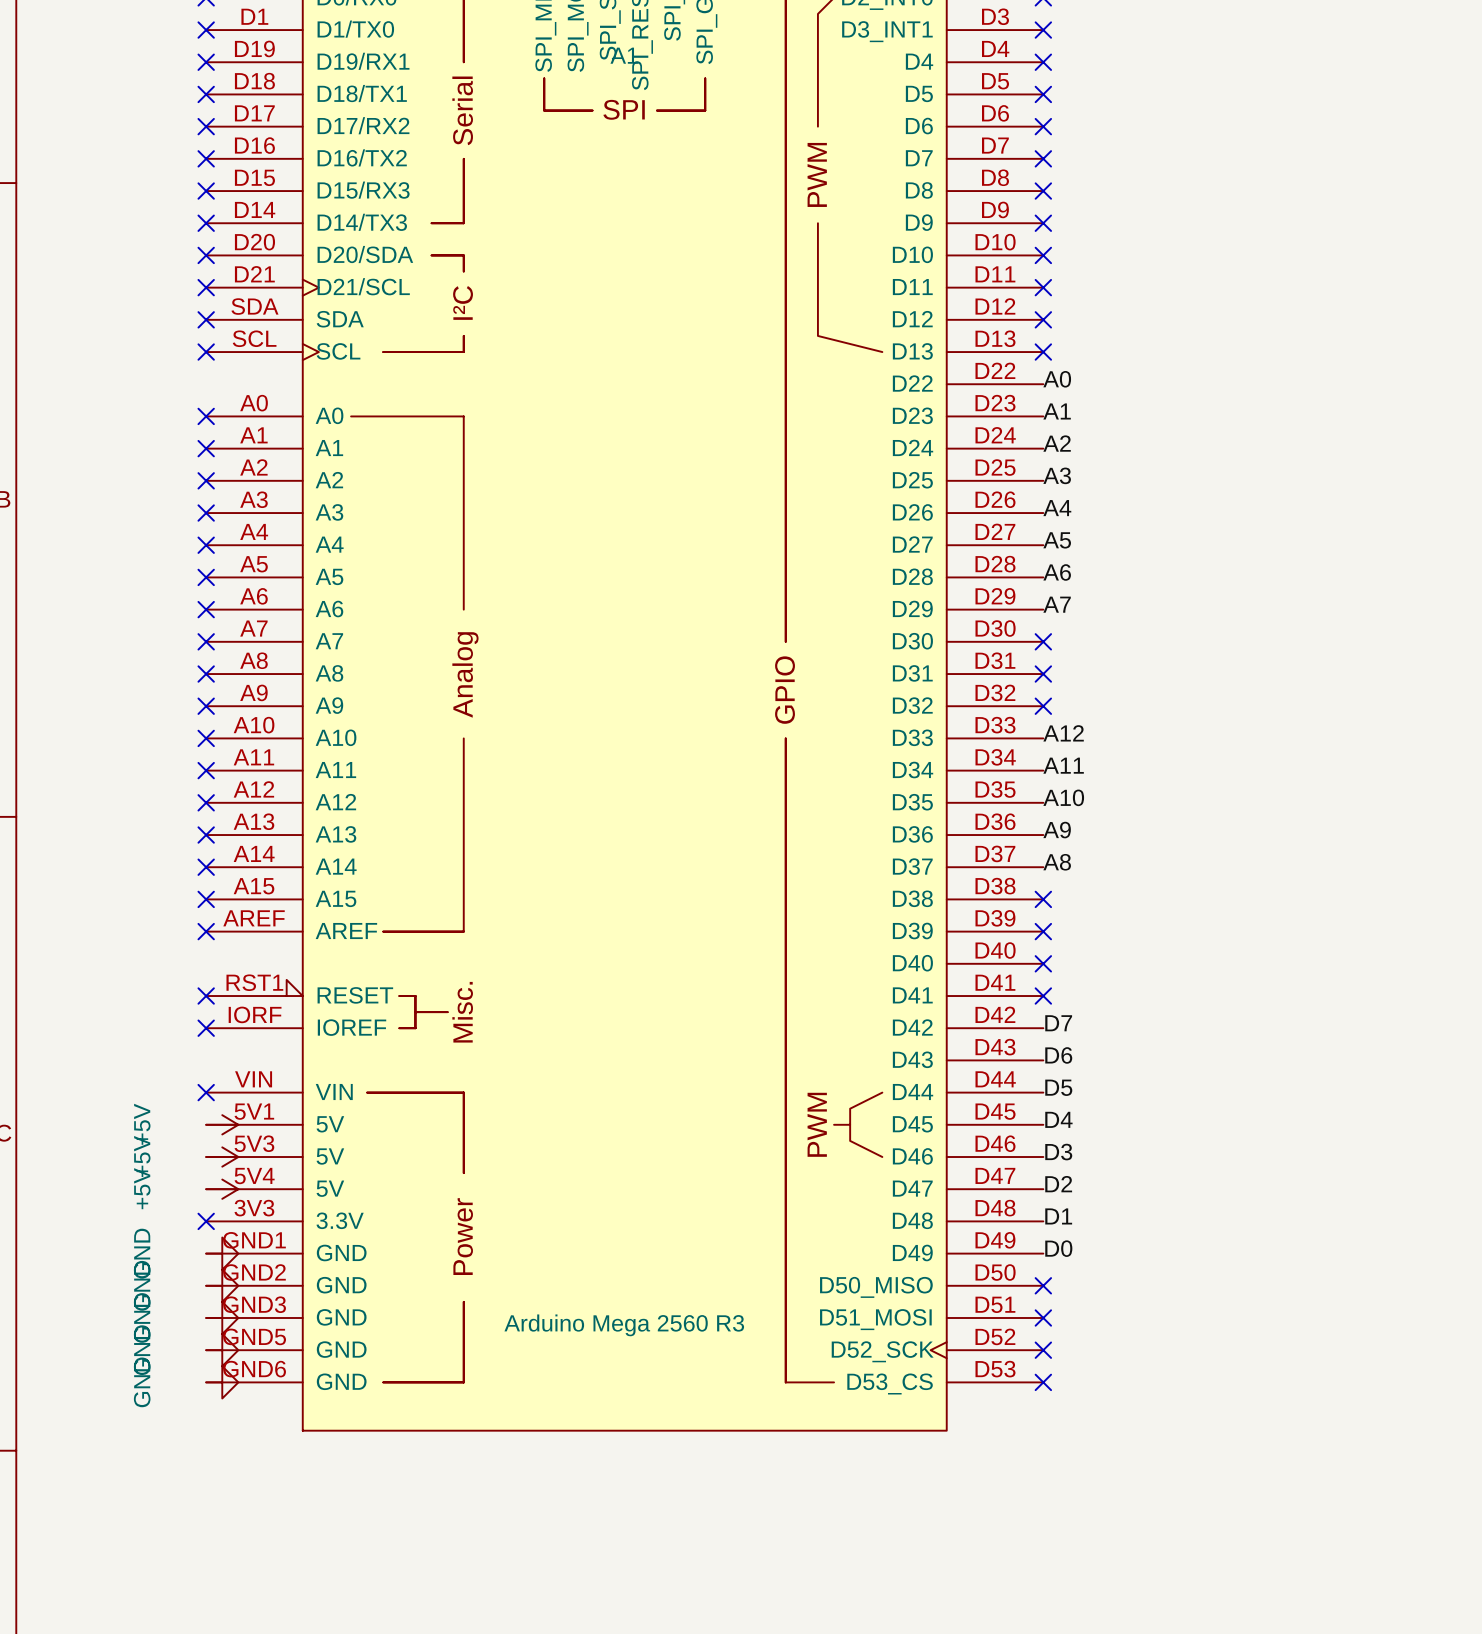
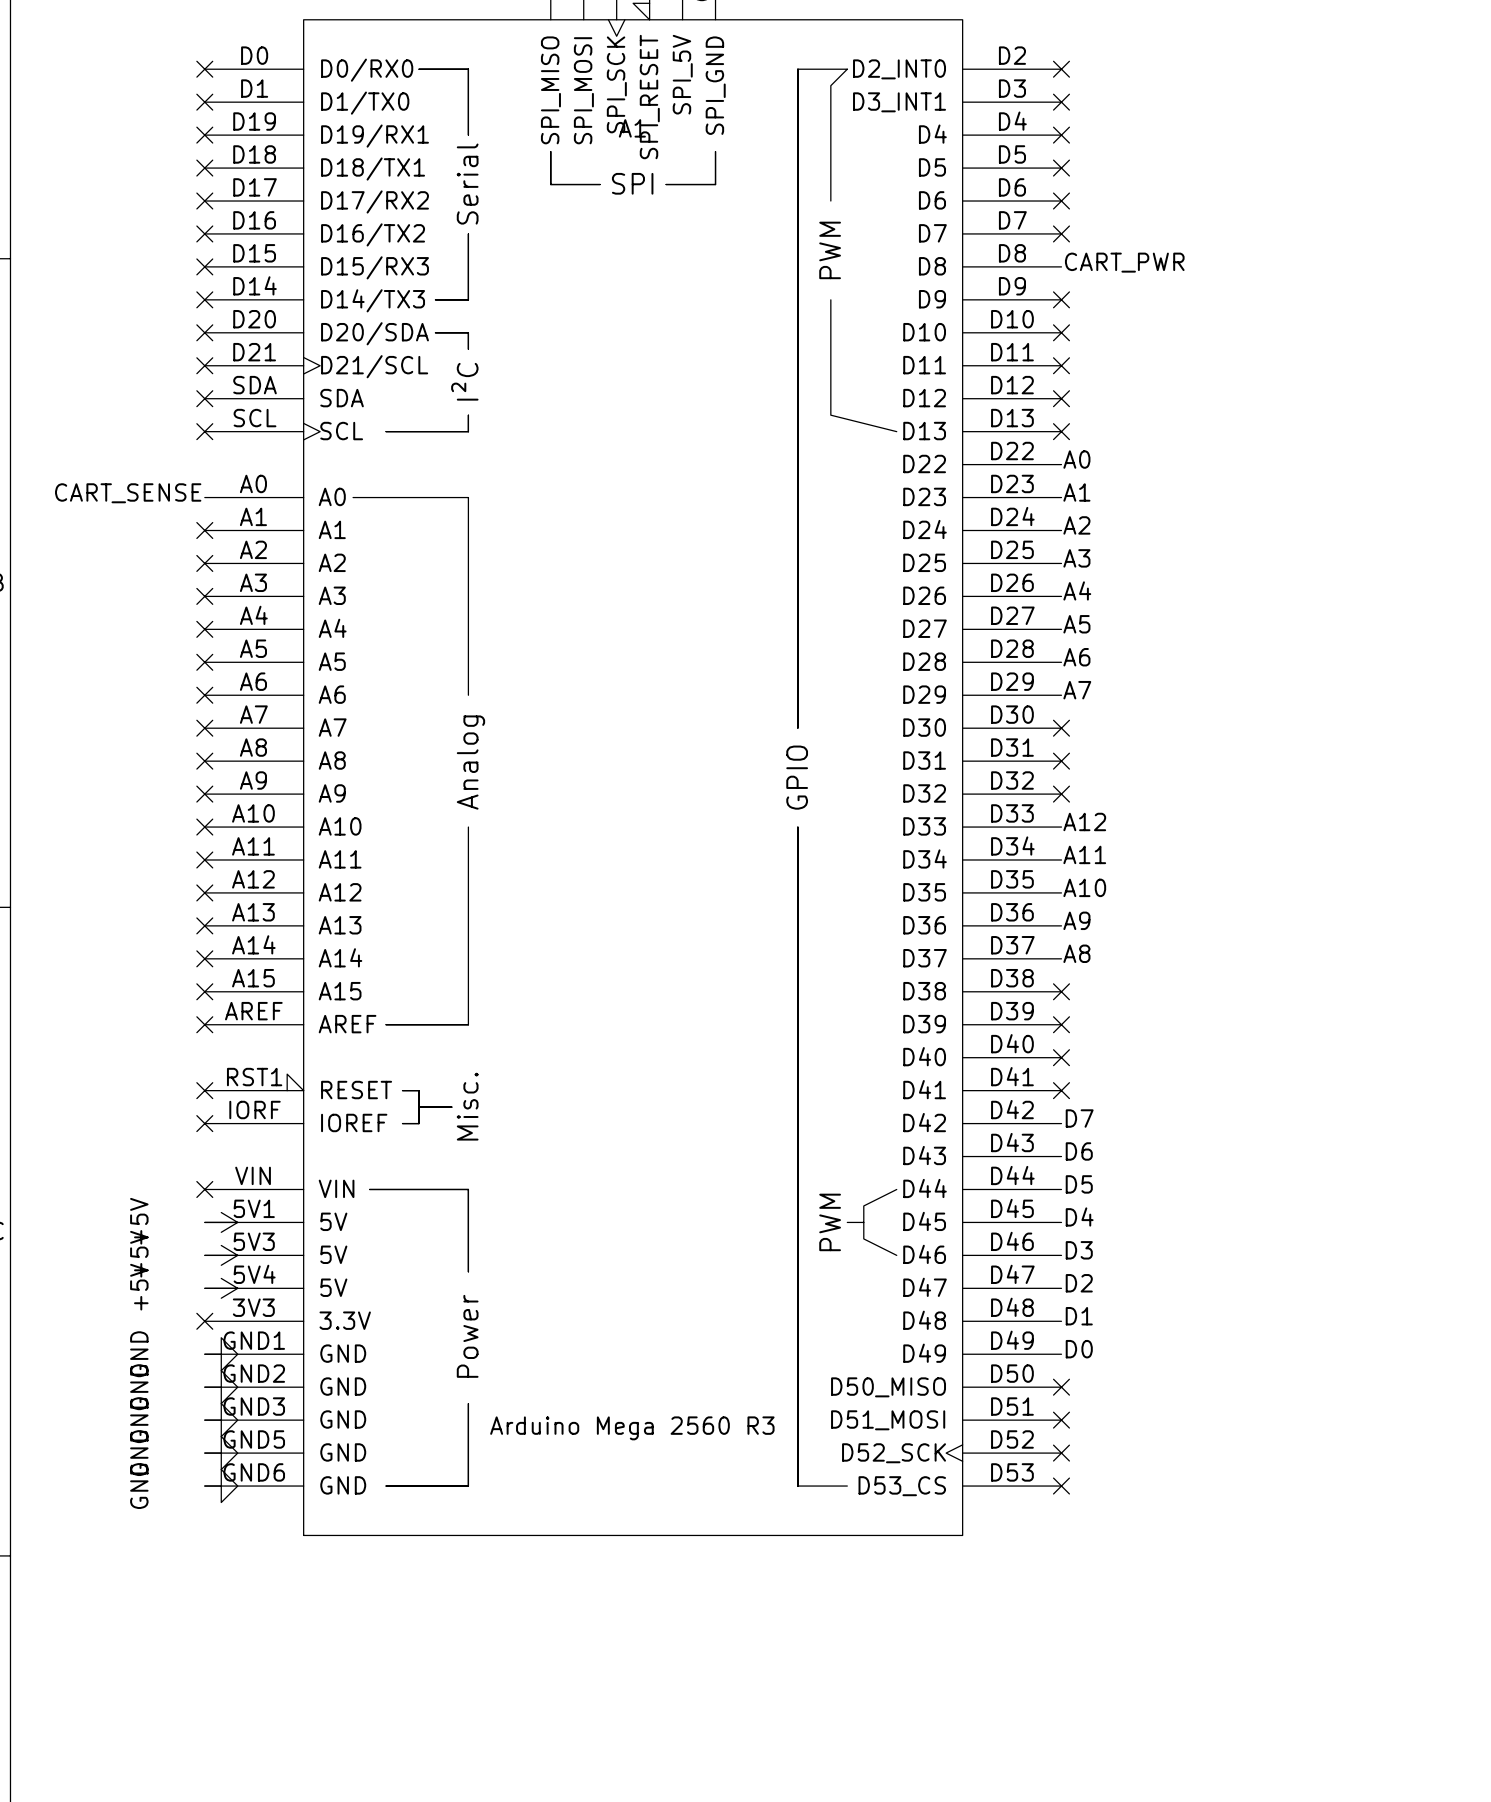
label: none -> CART_PWR (1124, 262)
no-connect mark: (1043, 191) -> none
label: none -> CART_SENSE (128, 493)
no-connect mark: (206, 416) -> none

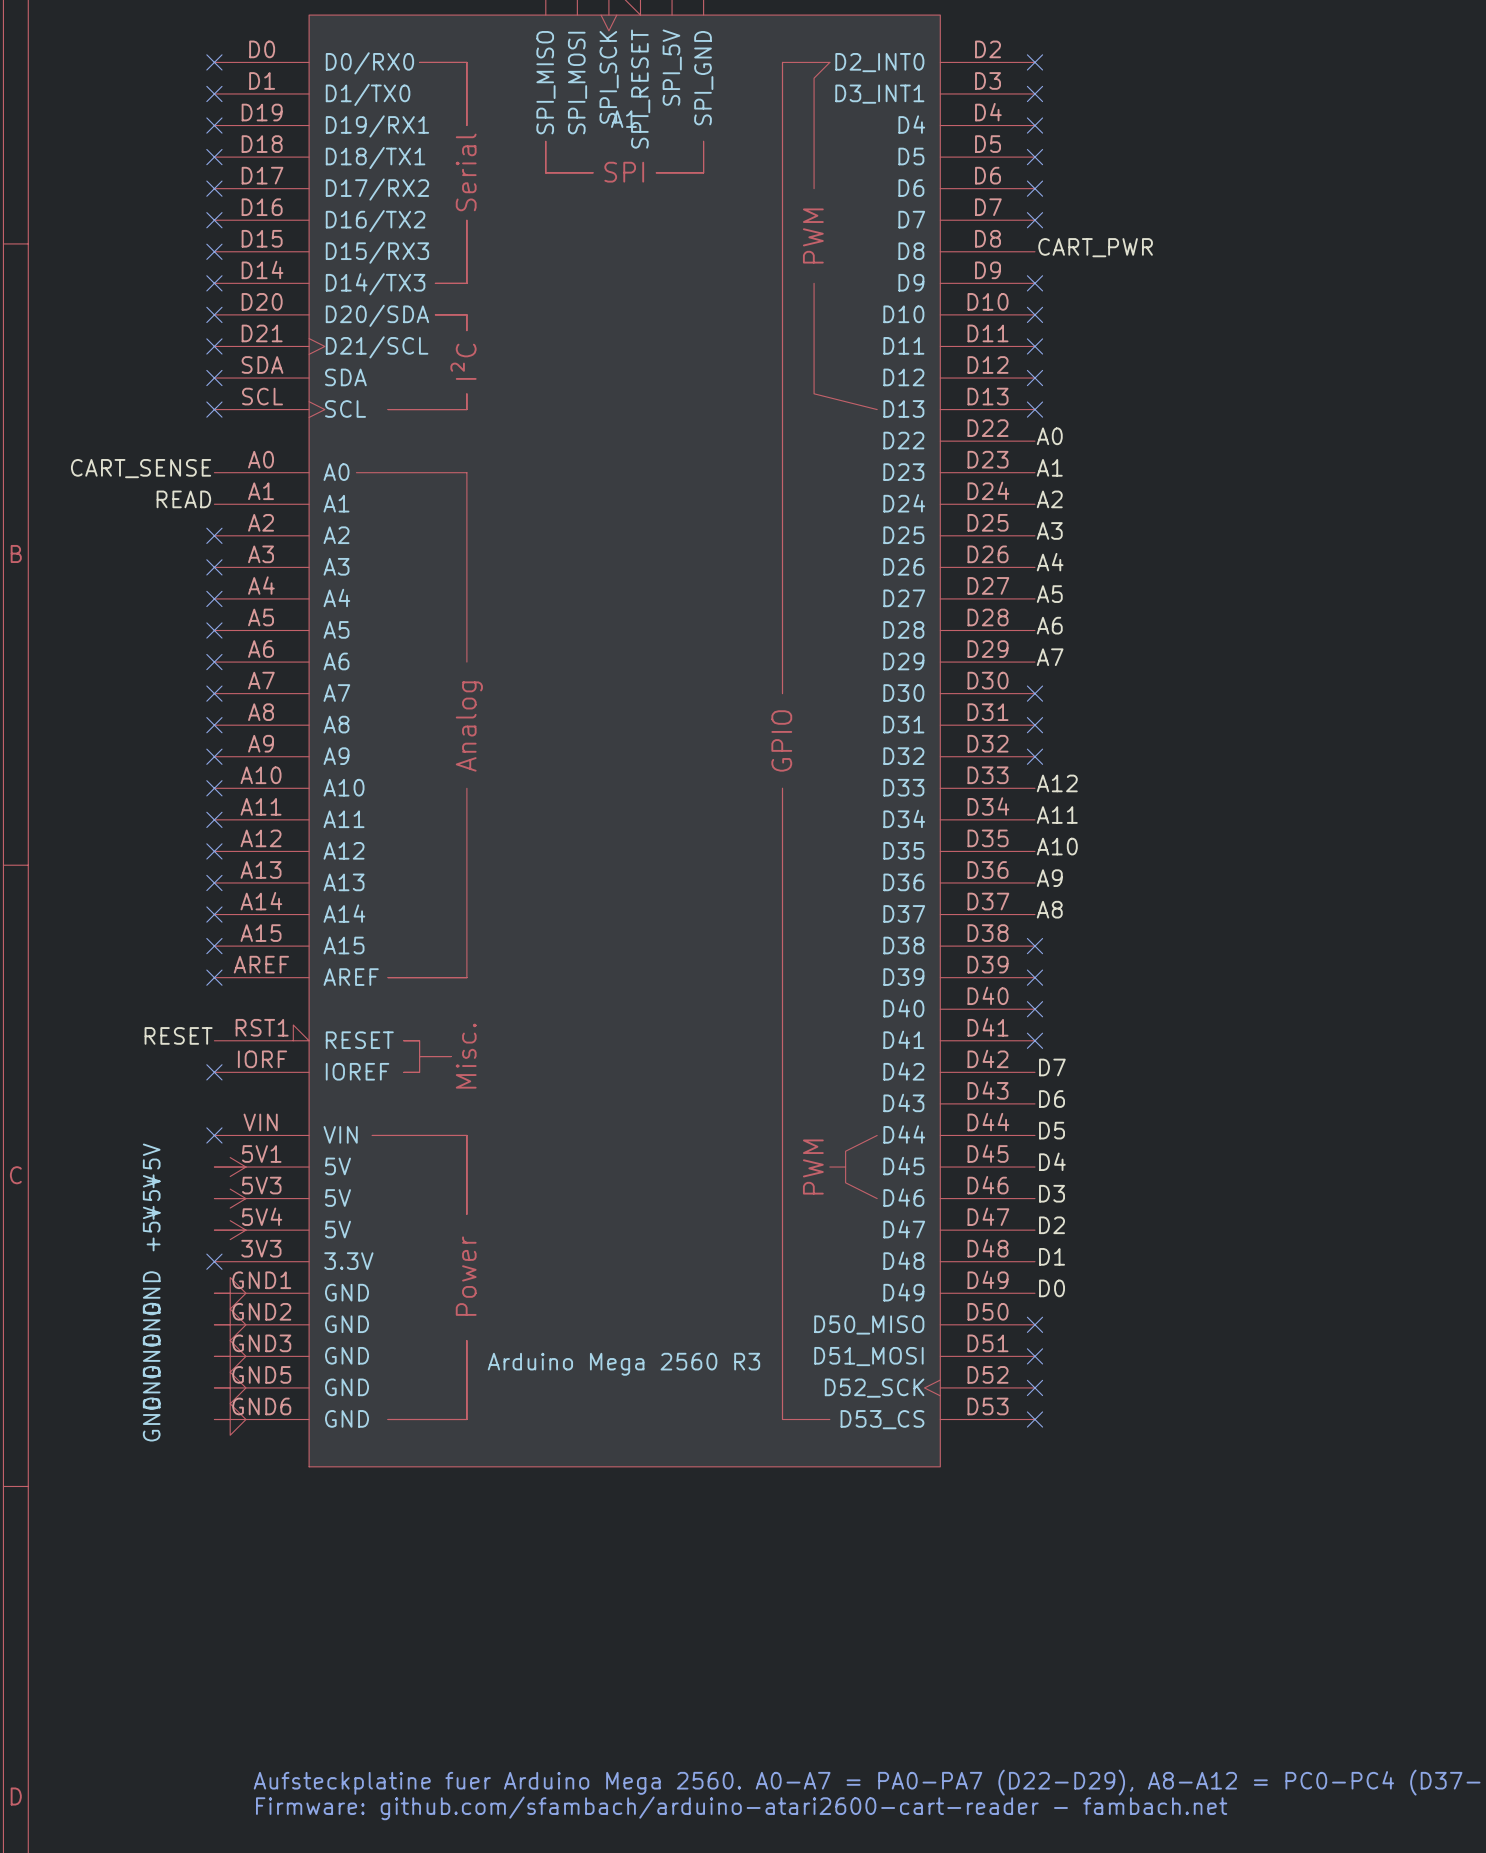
label: none -> READ (183, 499)
no-connect mark: (204, 530) -> none
label: none -> RESET (178, 1035)
no-connect mark: (204, 1090) -> none

